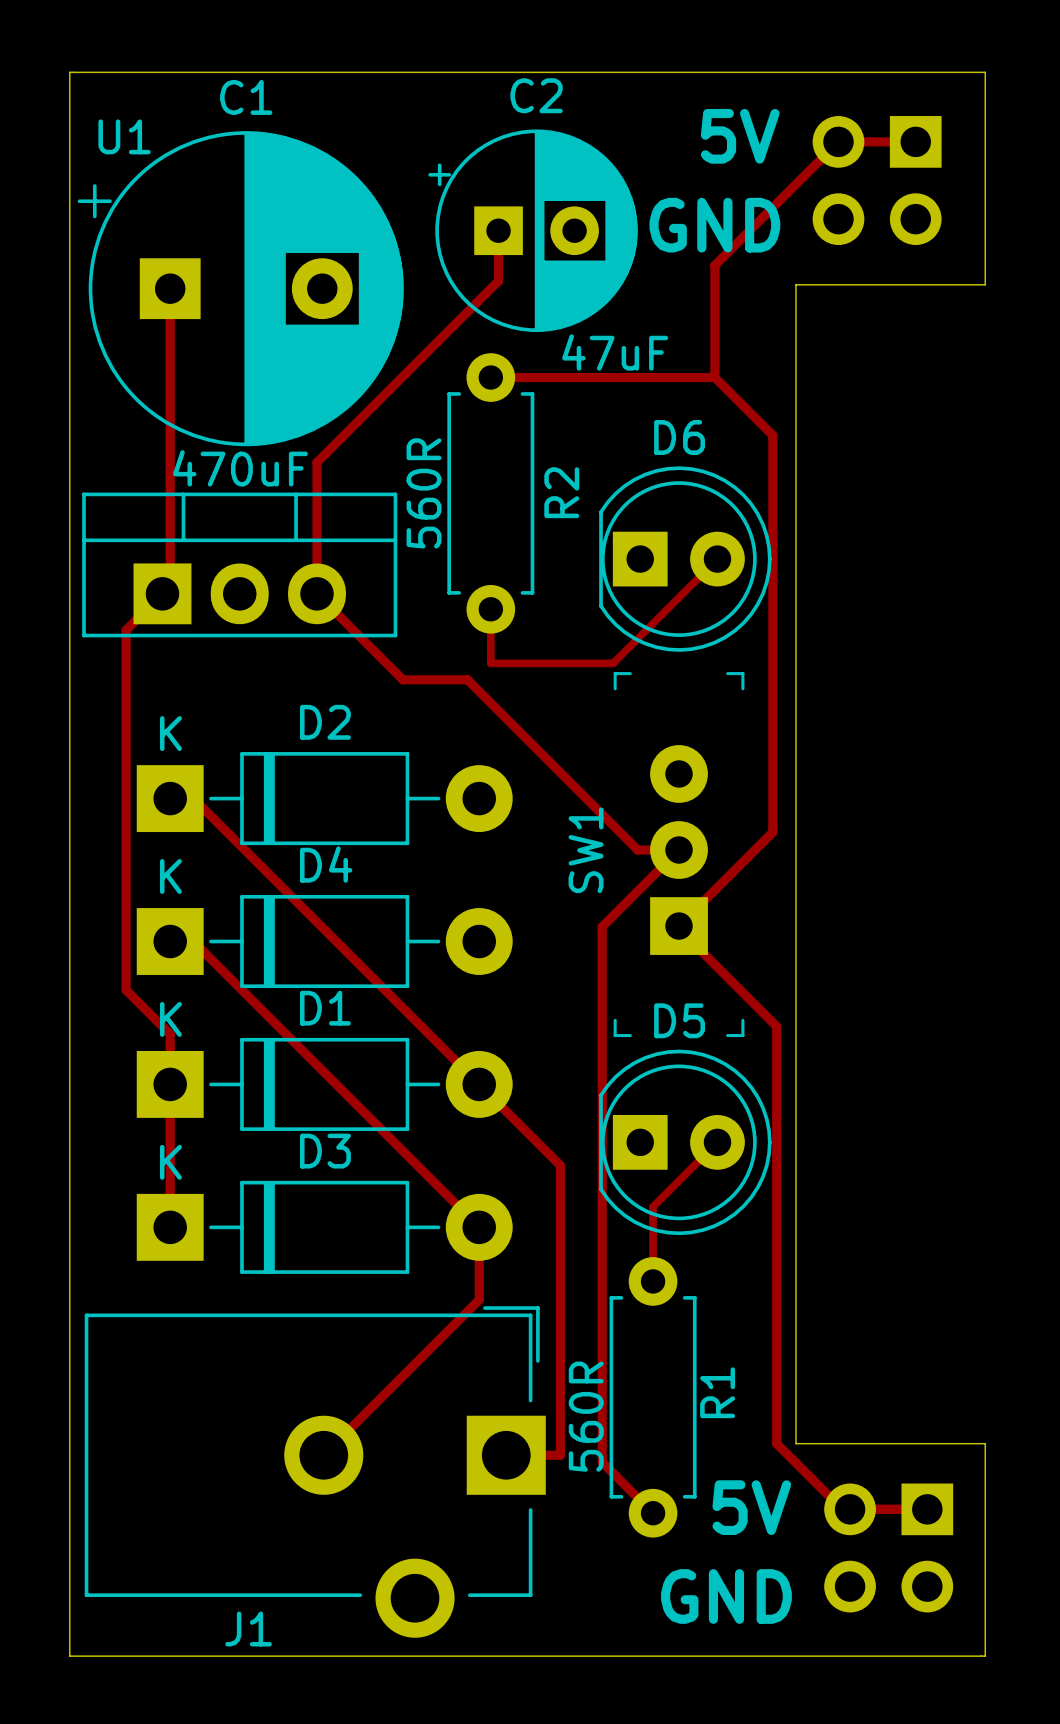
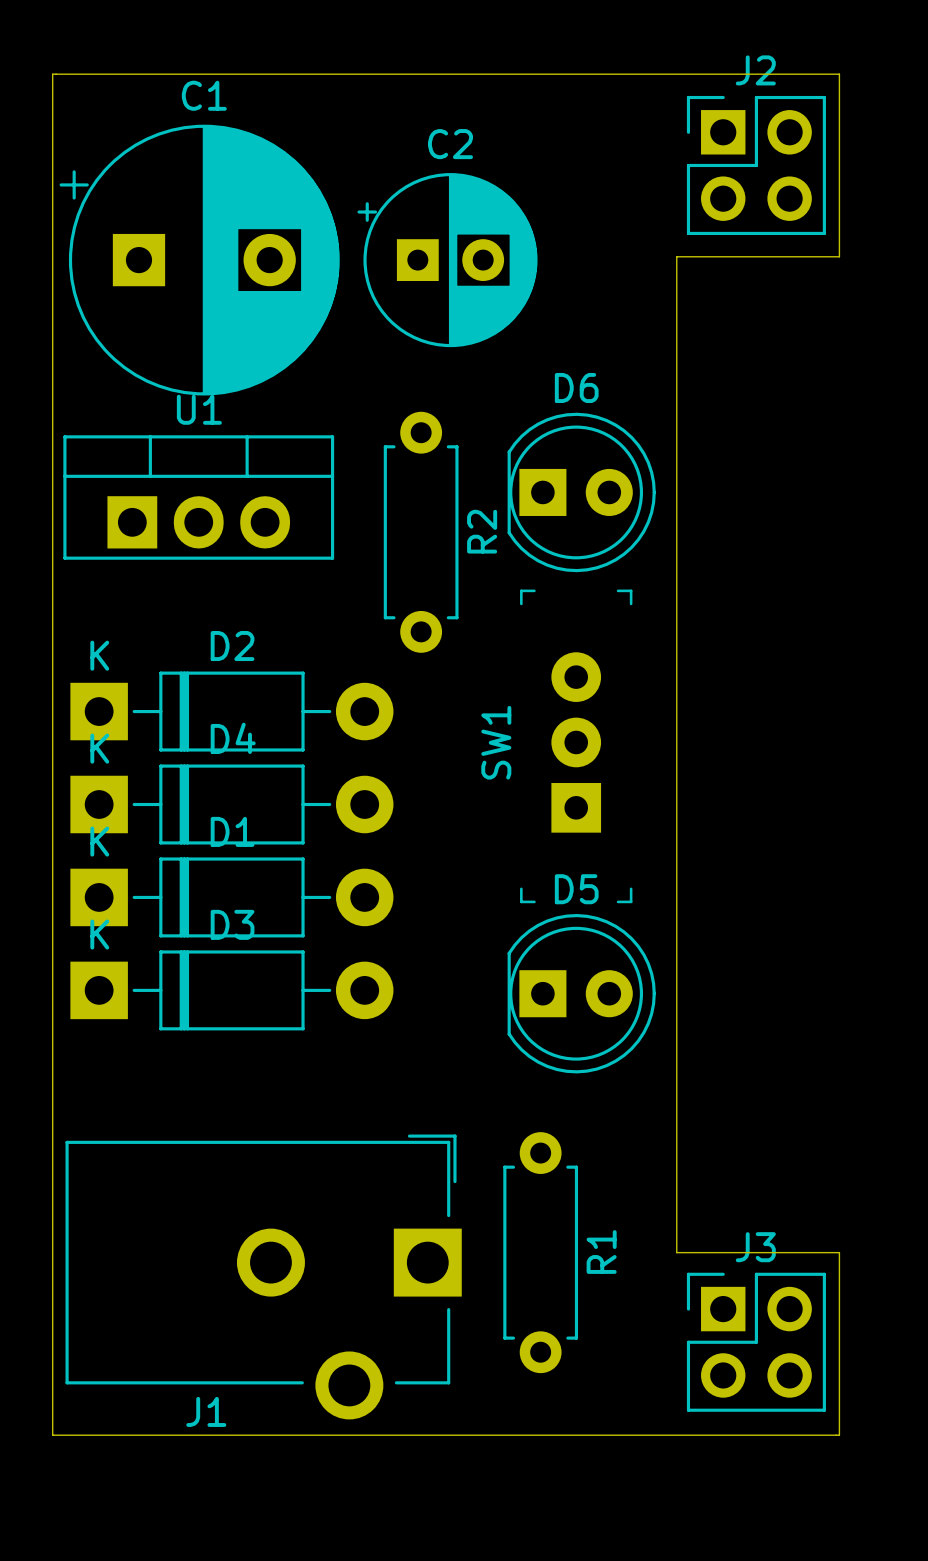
U1 name position: U1 (124, 136) -> U1 (199, 409)
text: 5V (740, 136) -> none
track: (915, 141) (838, 141) (714, 265) (714, 377) -> none
J2 side: bottom (877, 180) -> top (756, 165)
text: GND (714, 225) -> none
track: (498, 230) (498, 280) (316, 462) (316, 593) (402, 679) (467, 679) (637, 850) (679, 850) (602, 926) (602, 1462) (653, 1513) -> none
C2 position: (533, 230) -> (447, 260)
track: (170, 288) (170, 586) (126, 630) (126, 990) (170, 1034) (170, 1227) -> none
text: 47uF (615, 352) -> none
track: (490, 377) (714, 377) -> none
track: (714, 377) (772, 435) (772, 832) (679, 926) (679, 928) (776, 1026) (776, 1443) (842, 1509) (927, 1509) -> none
text: 470uF (240, 468) -> none
text: 560R (424, 493) -> none
R2 position: (490, 493) -> (421, 532)
track: (717, 559) (613, 663) (490, 663) (490, 609) -> none
track: (170, 798) (193, 798) (560, 1165) (560, 1455) (506, 1455) -> none
D2 position: (324, 798) -> (231, 711)
track: (170, 941) (193, 941) (479, 1227) (479, 1299) (323, 1455) -> none
D4 position: (324, 941) -> (231, 804)
D1 position: (324, 1084) -> (231, 897)
track: (717, 1142) (653, 1206) (653, 1281) -> none
D3 position: (324, 1227) -> (231, 990)
R1 name position: R1 (717, 1392) -> R1 (601, 1252)
R1 position: (653, 1397) -> (540, 1252)
text: 560R (586, 1416) -> none
text: 5V (751, 1507) -> none
J3 side: bottom (888, 1547) -> top (756, 1342)
text: GND (726, 1596) -> none

